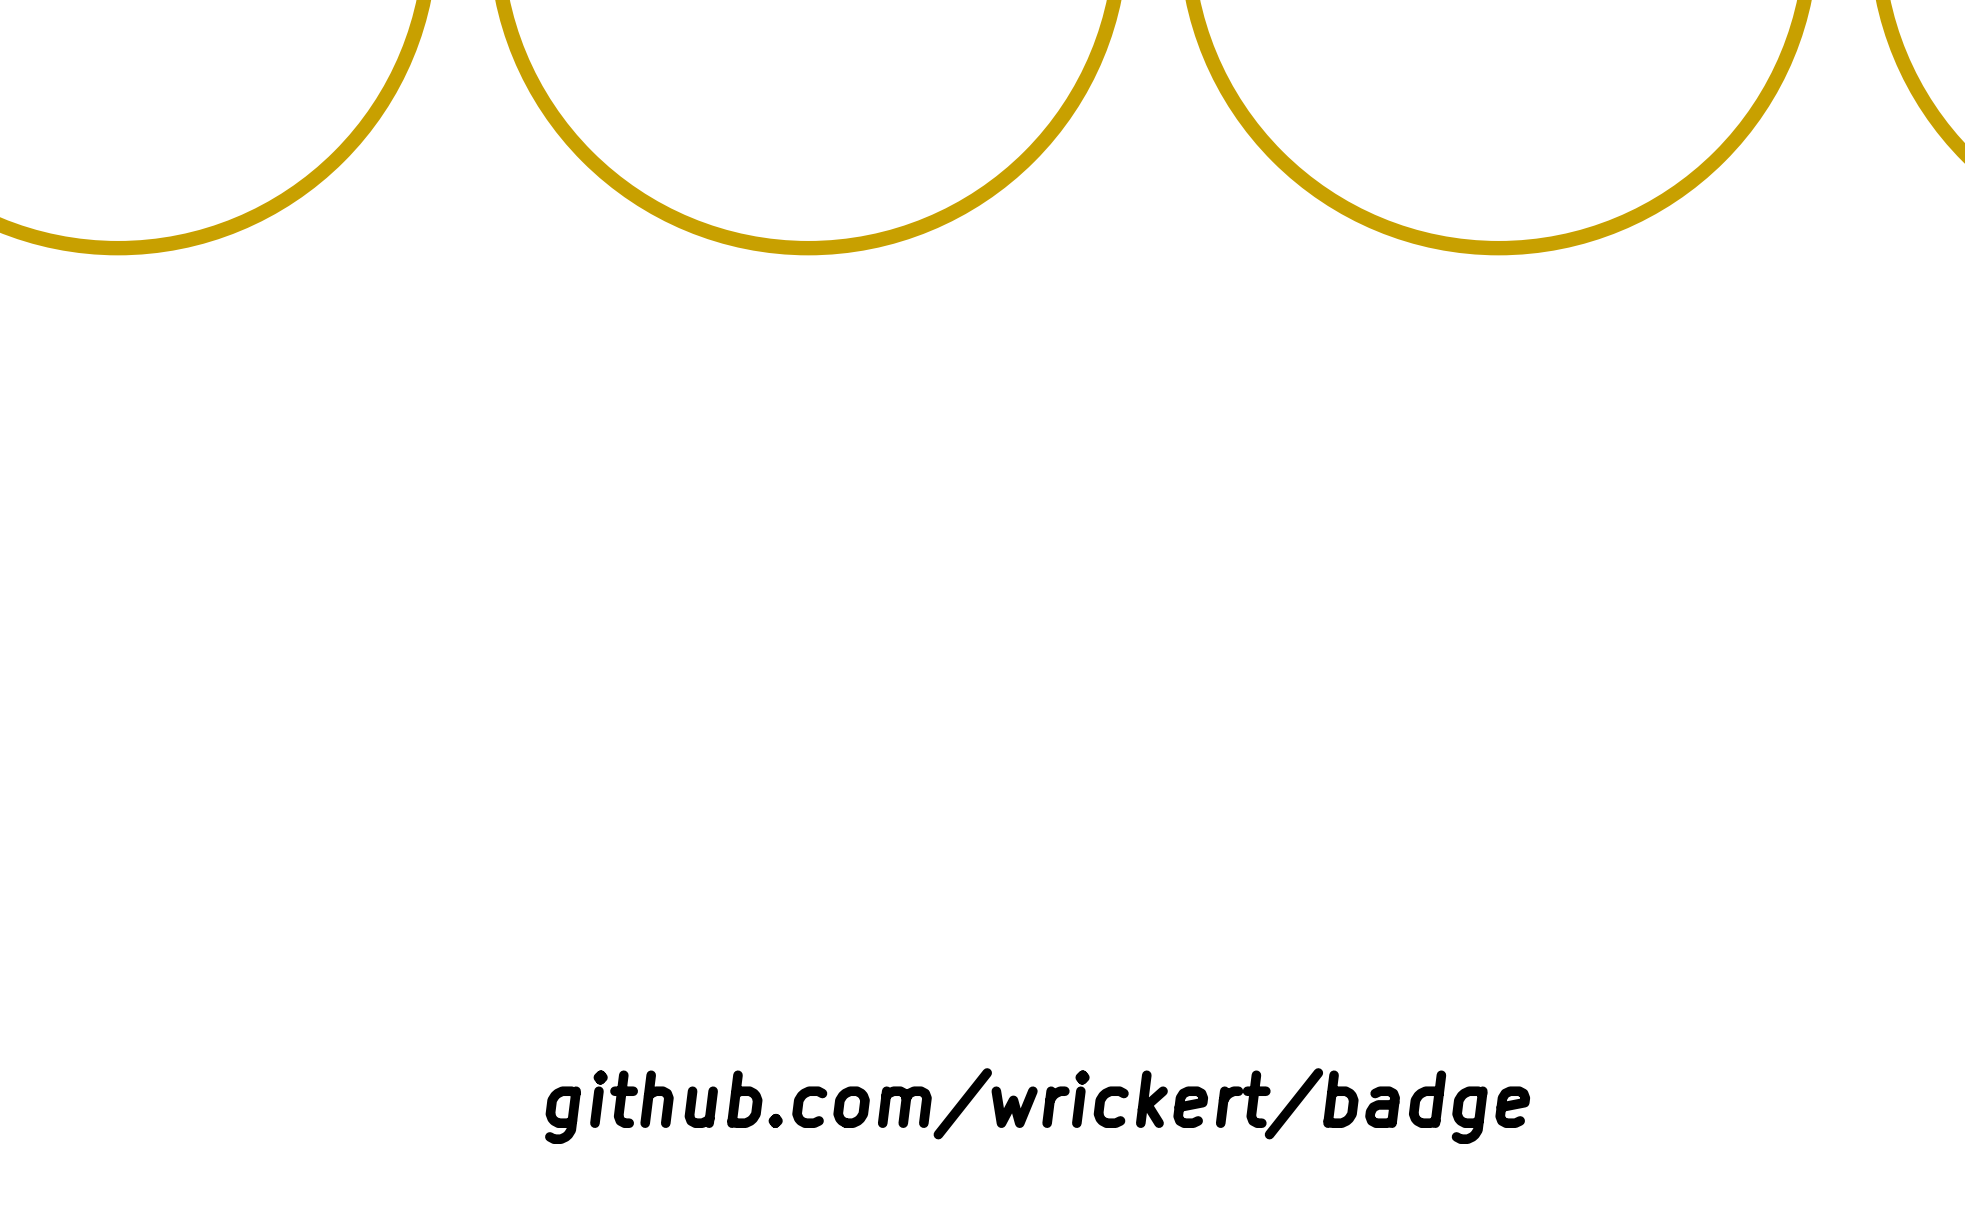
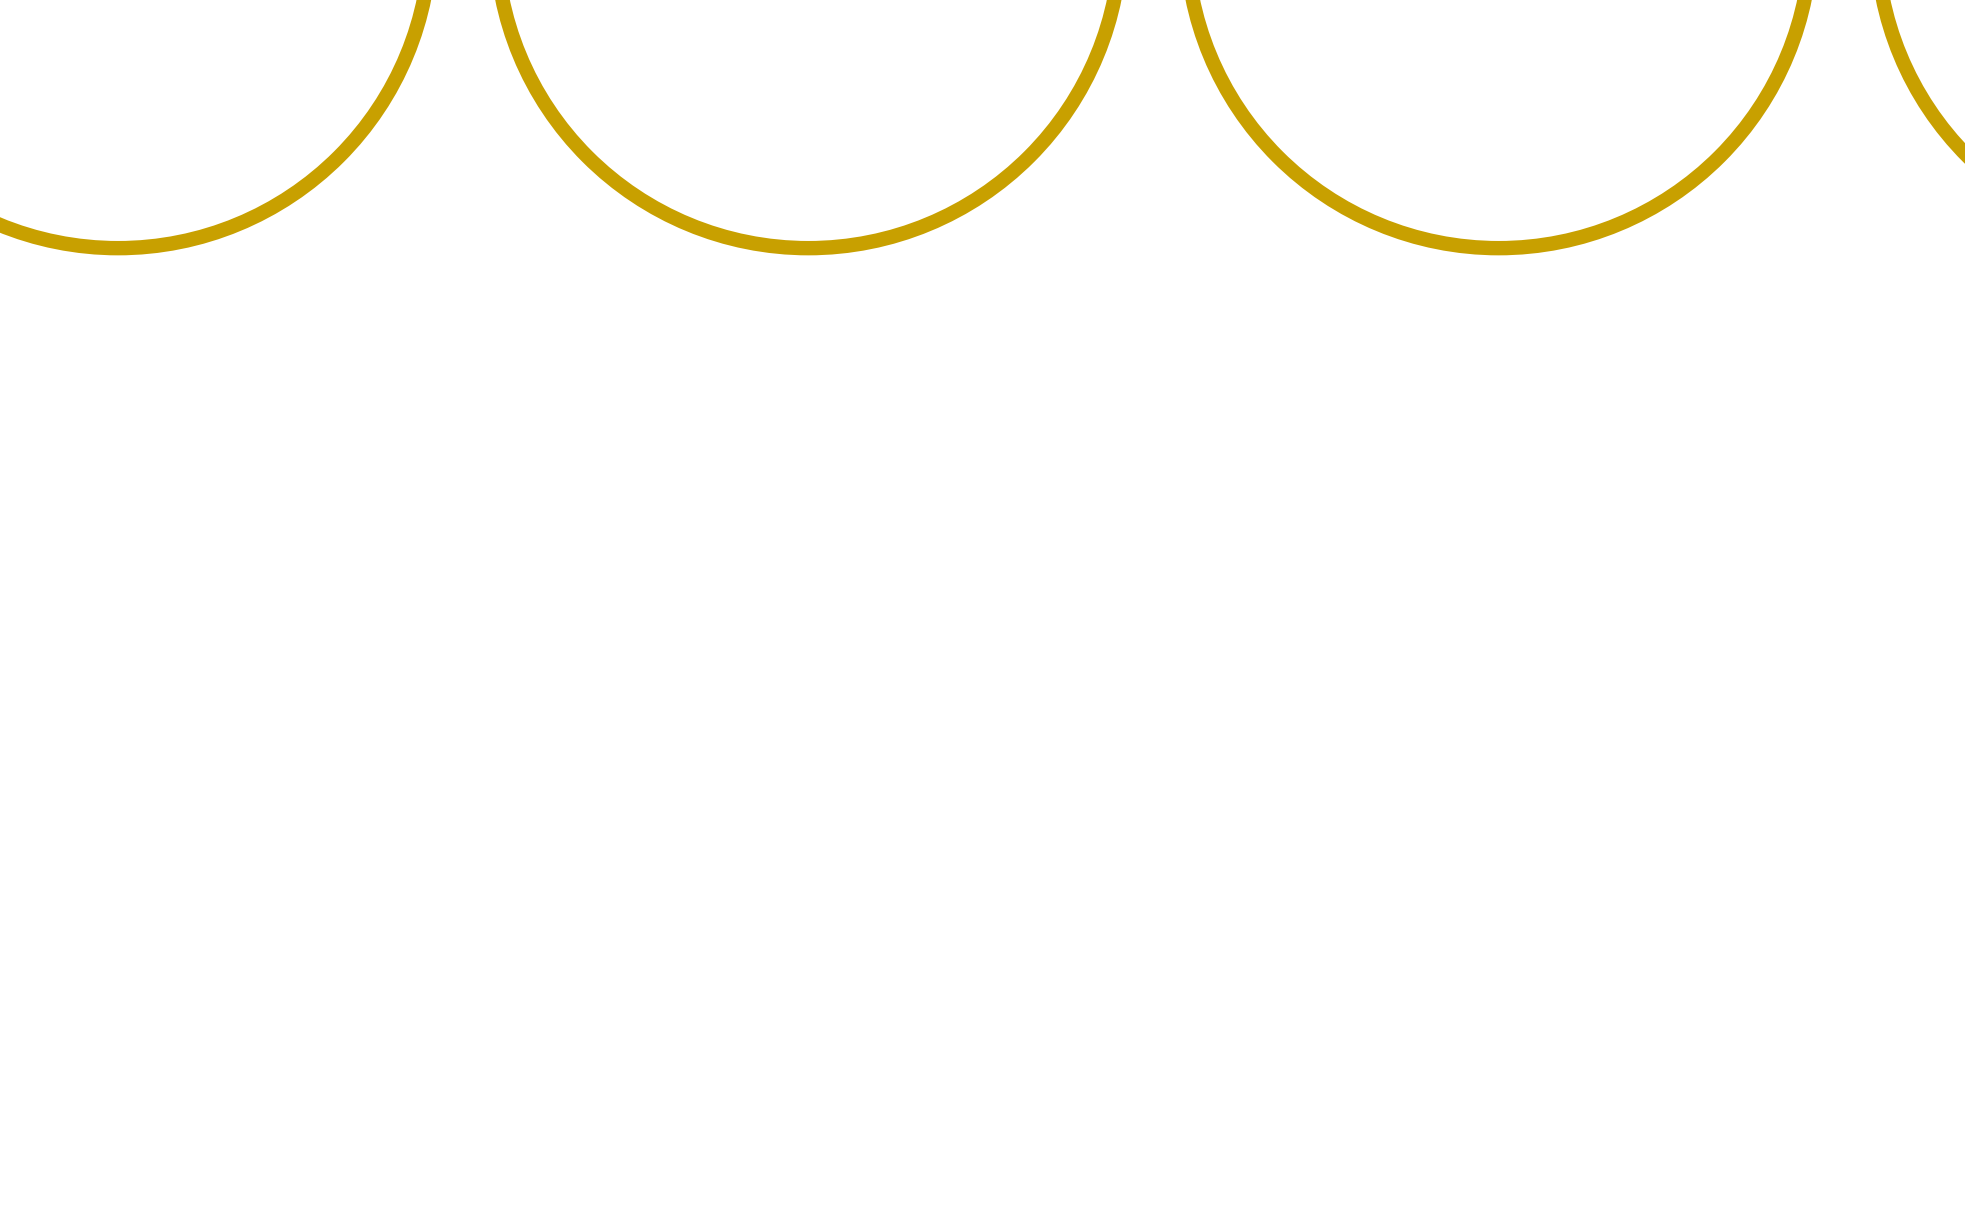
text: github.com/wrickert/badge (1037, 1106) -> none

